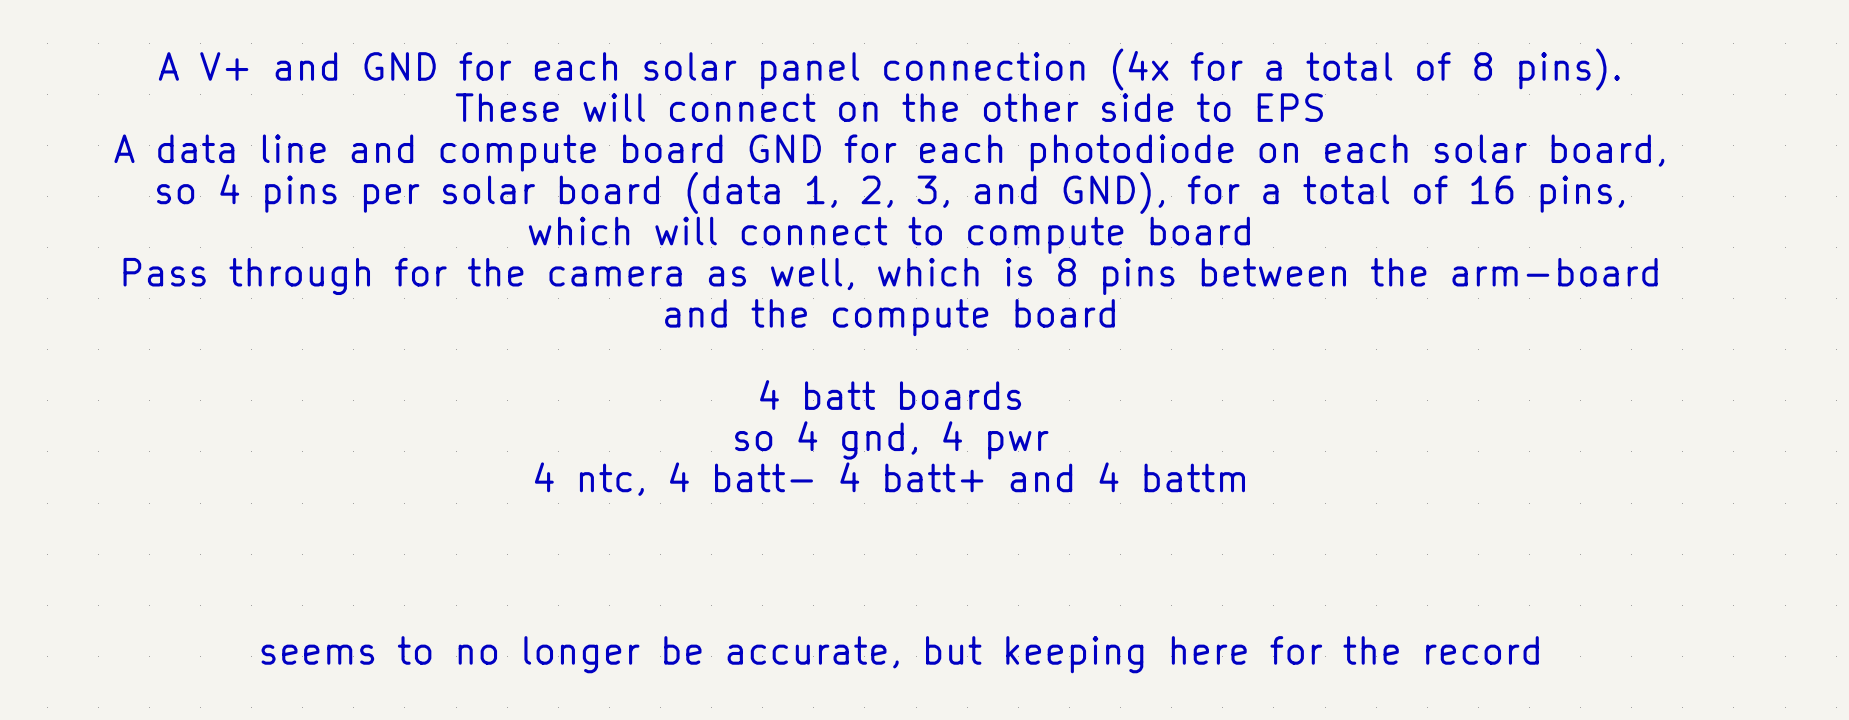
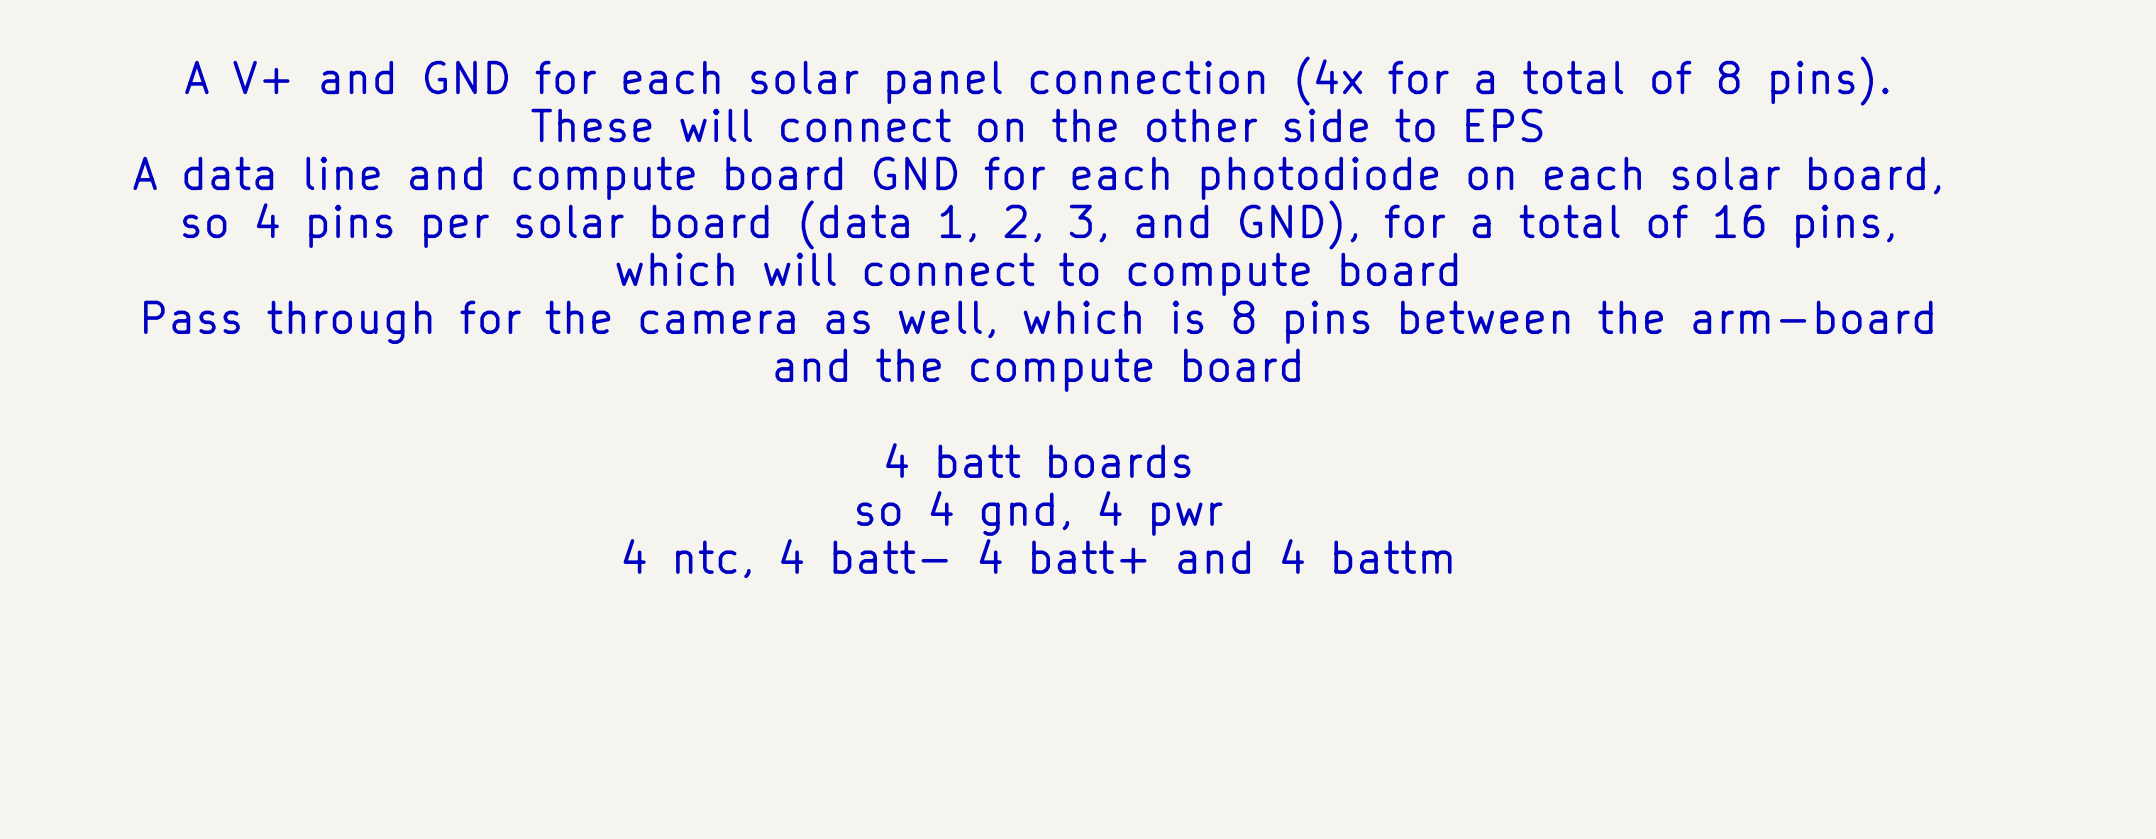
text: seems to no longer be accurate, but keeping here for the record (900, 654) -> none

